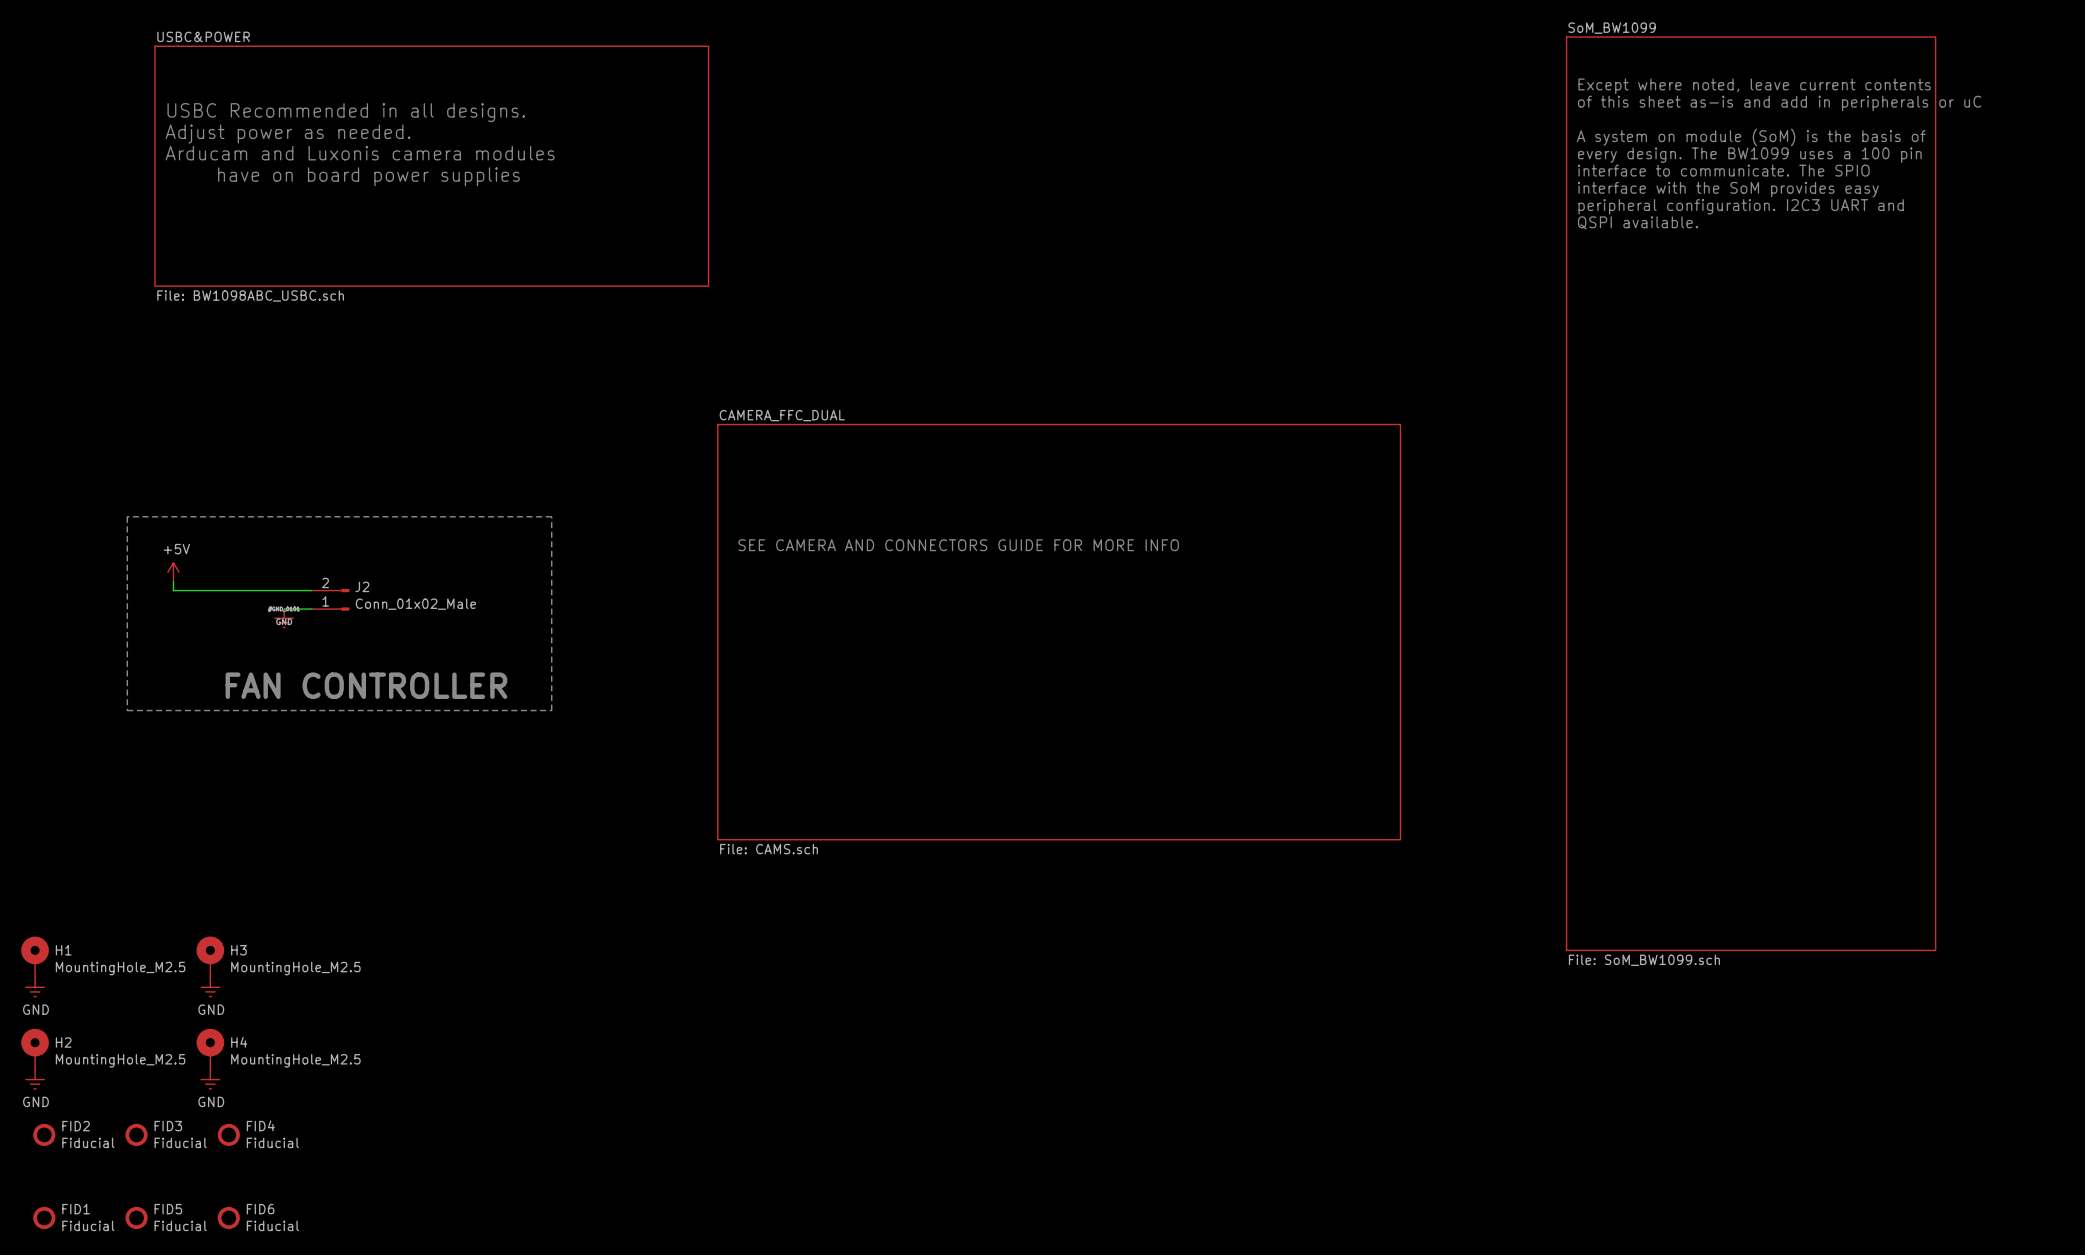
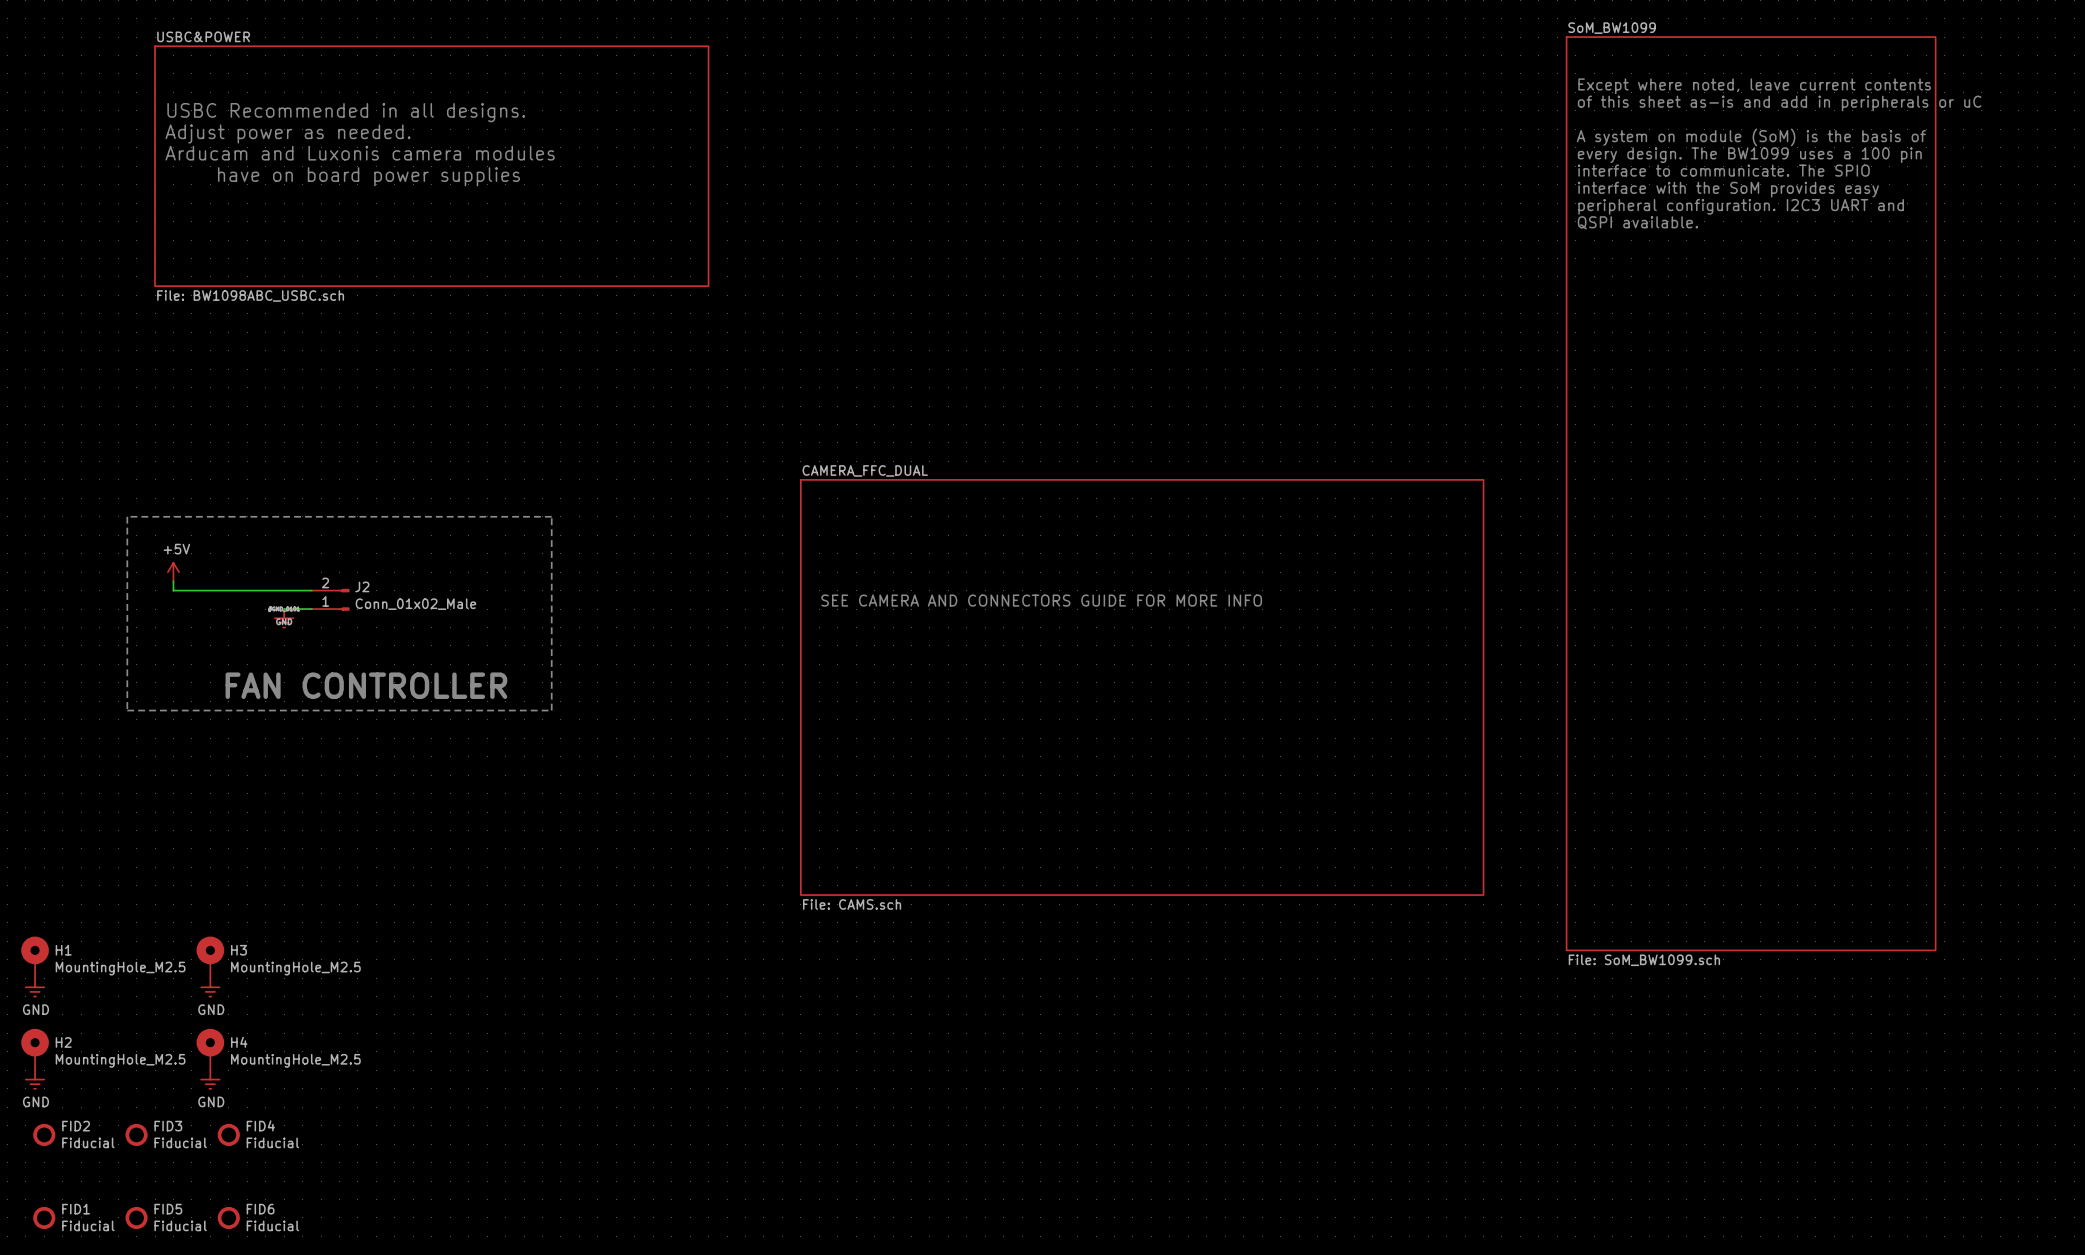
text position: SEE CAMERA AND CONNECTORS GUIDE FOR MORE INFO (958, 545) -> SEE CAMERA AND CONNECTORS GUIDE FOR MORE INFO (1041, 600)
sheet CAMERA_FFC_DUAL position: (1059, 632) -> (1142, 687)

